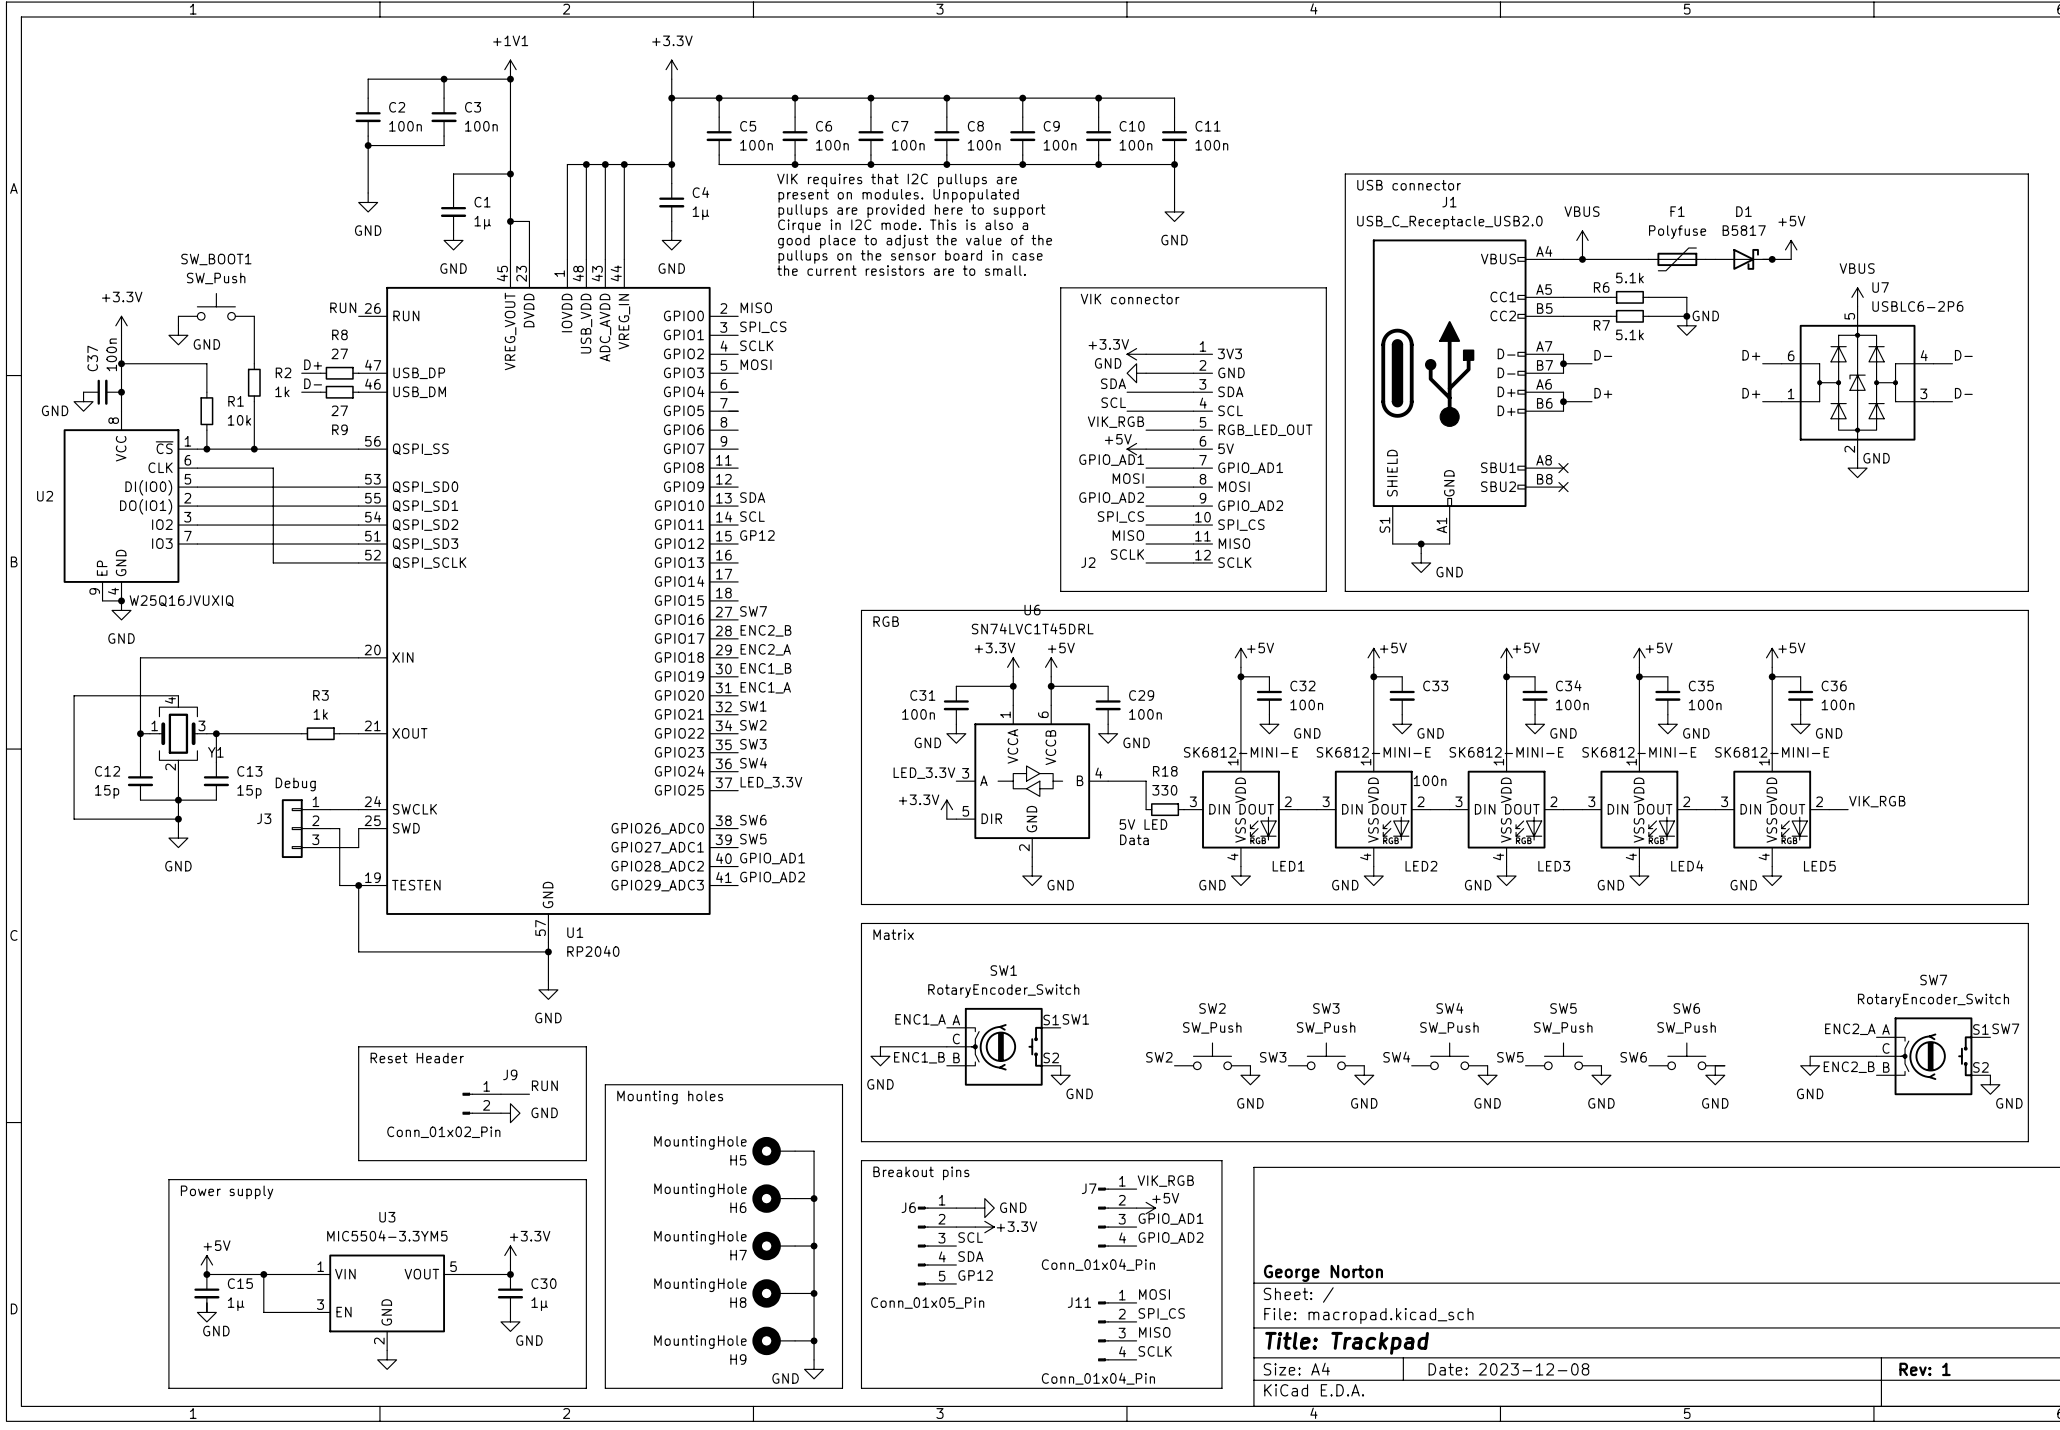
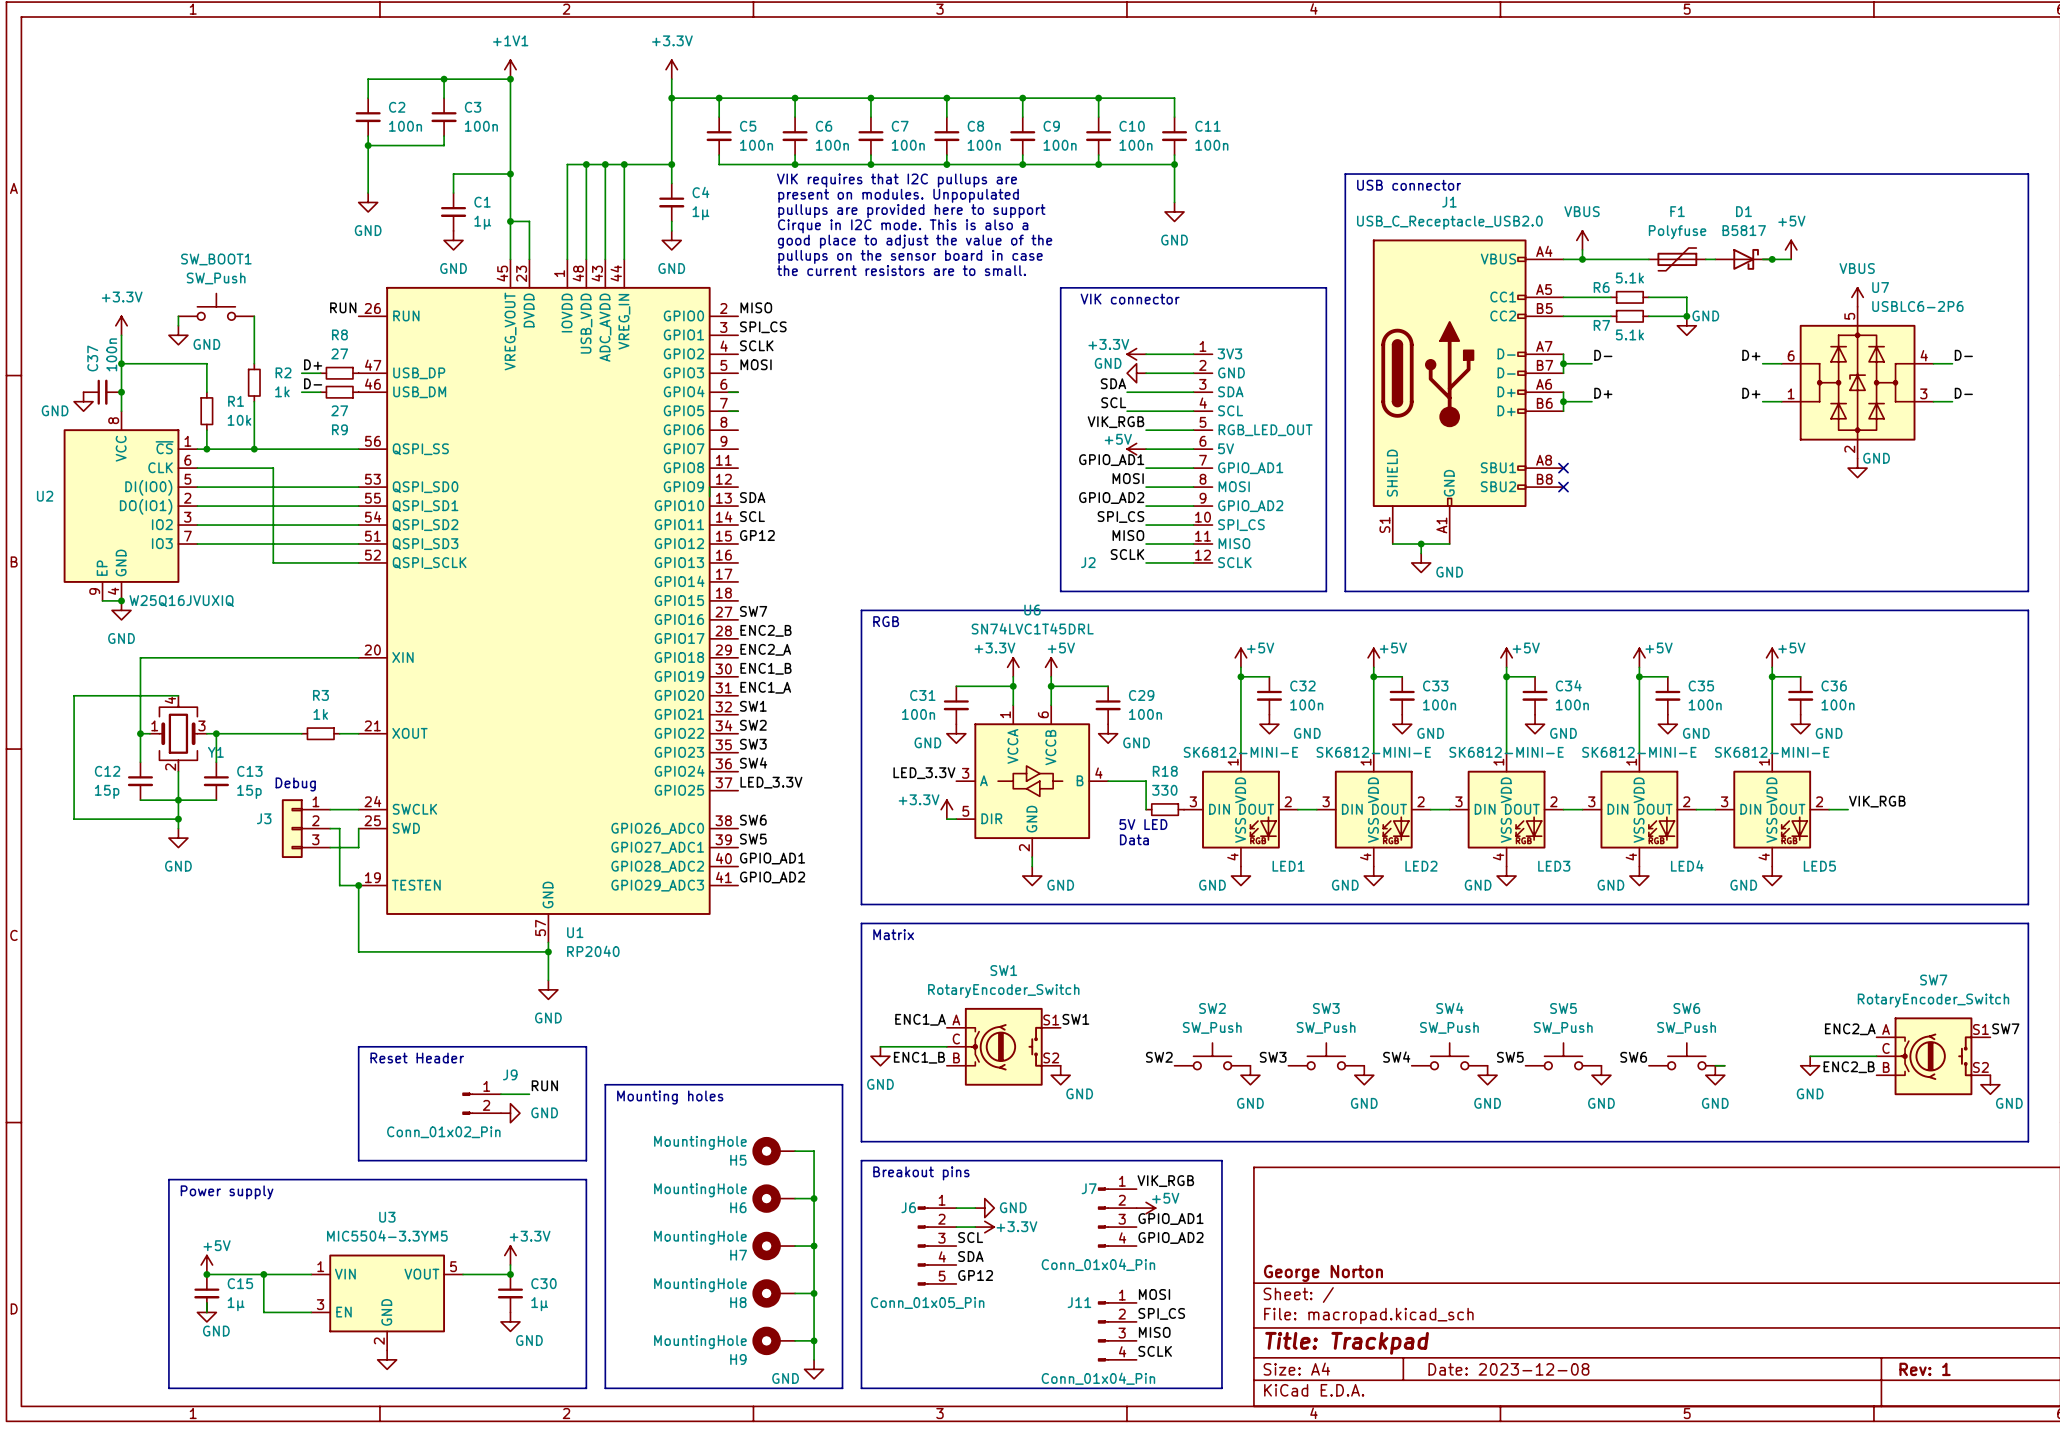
C33 value position: 100n (1430, 780) -> 100n (1439, 704)

